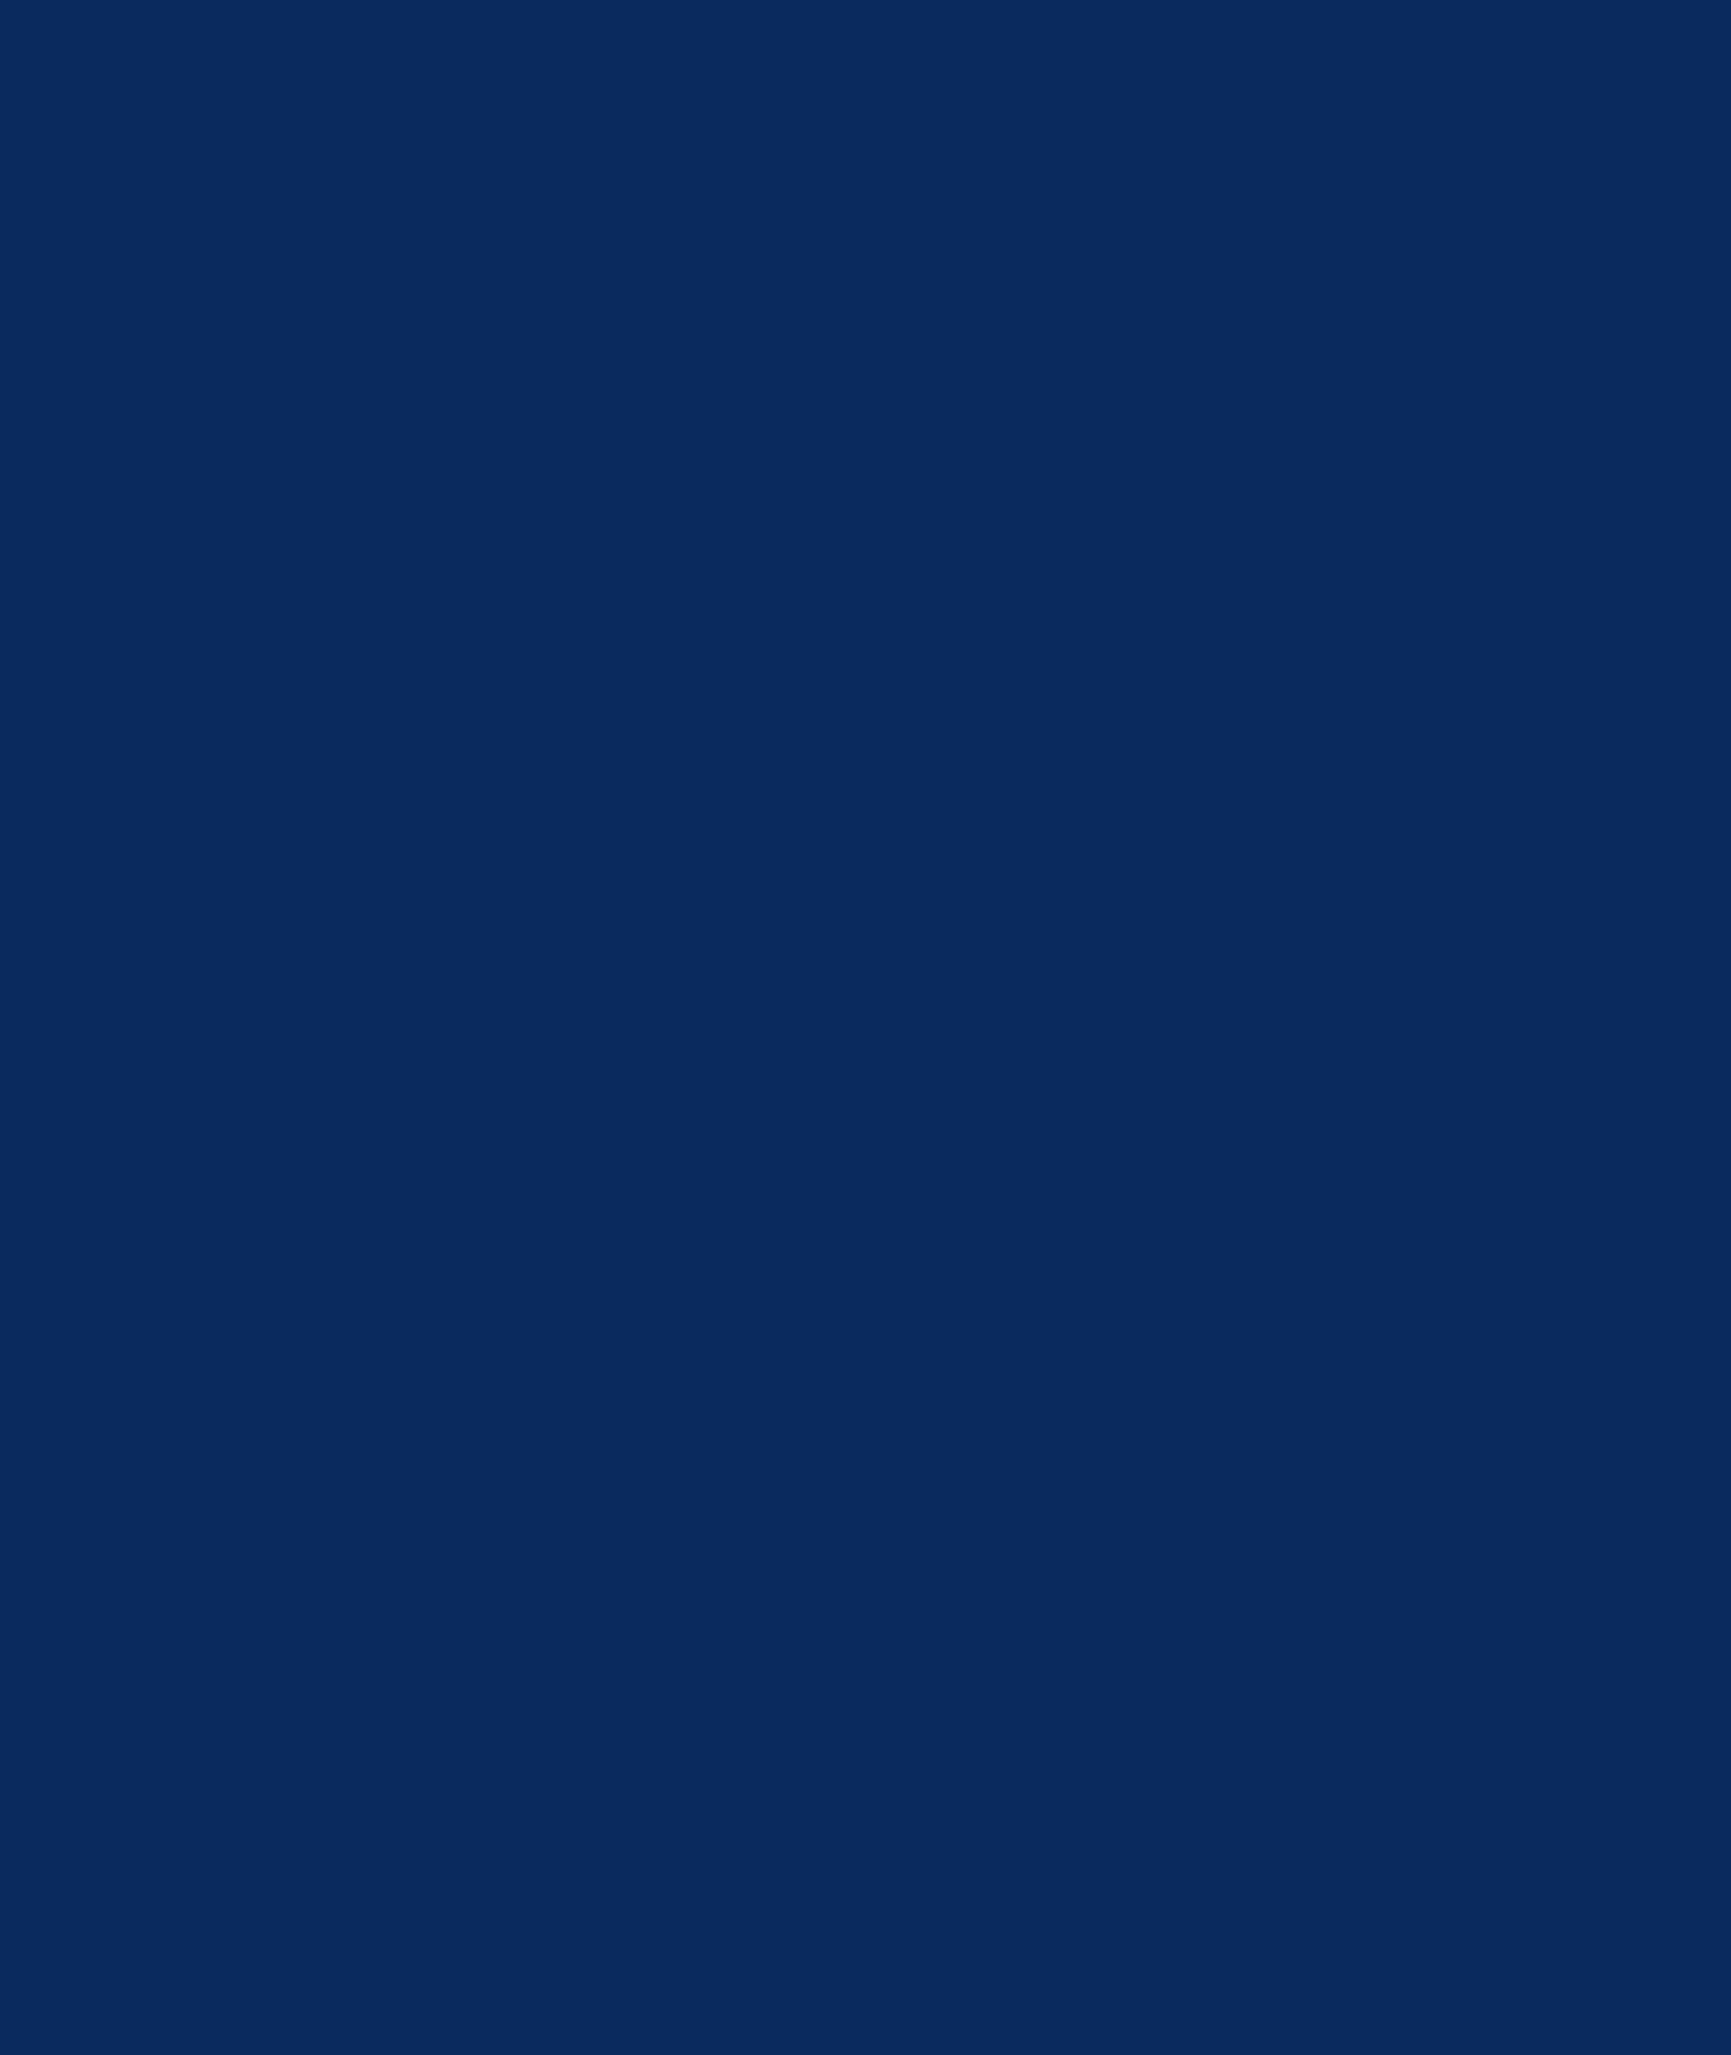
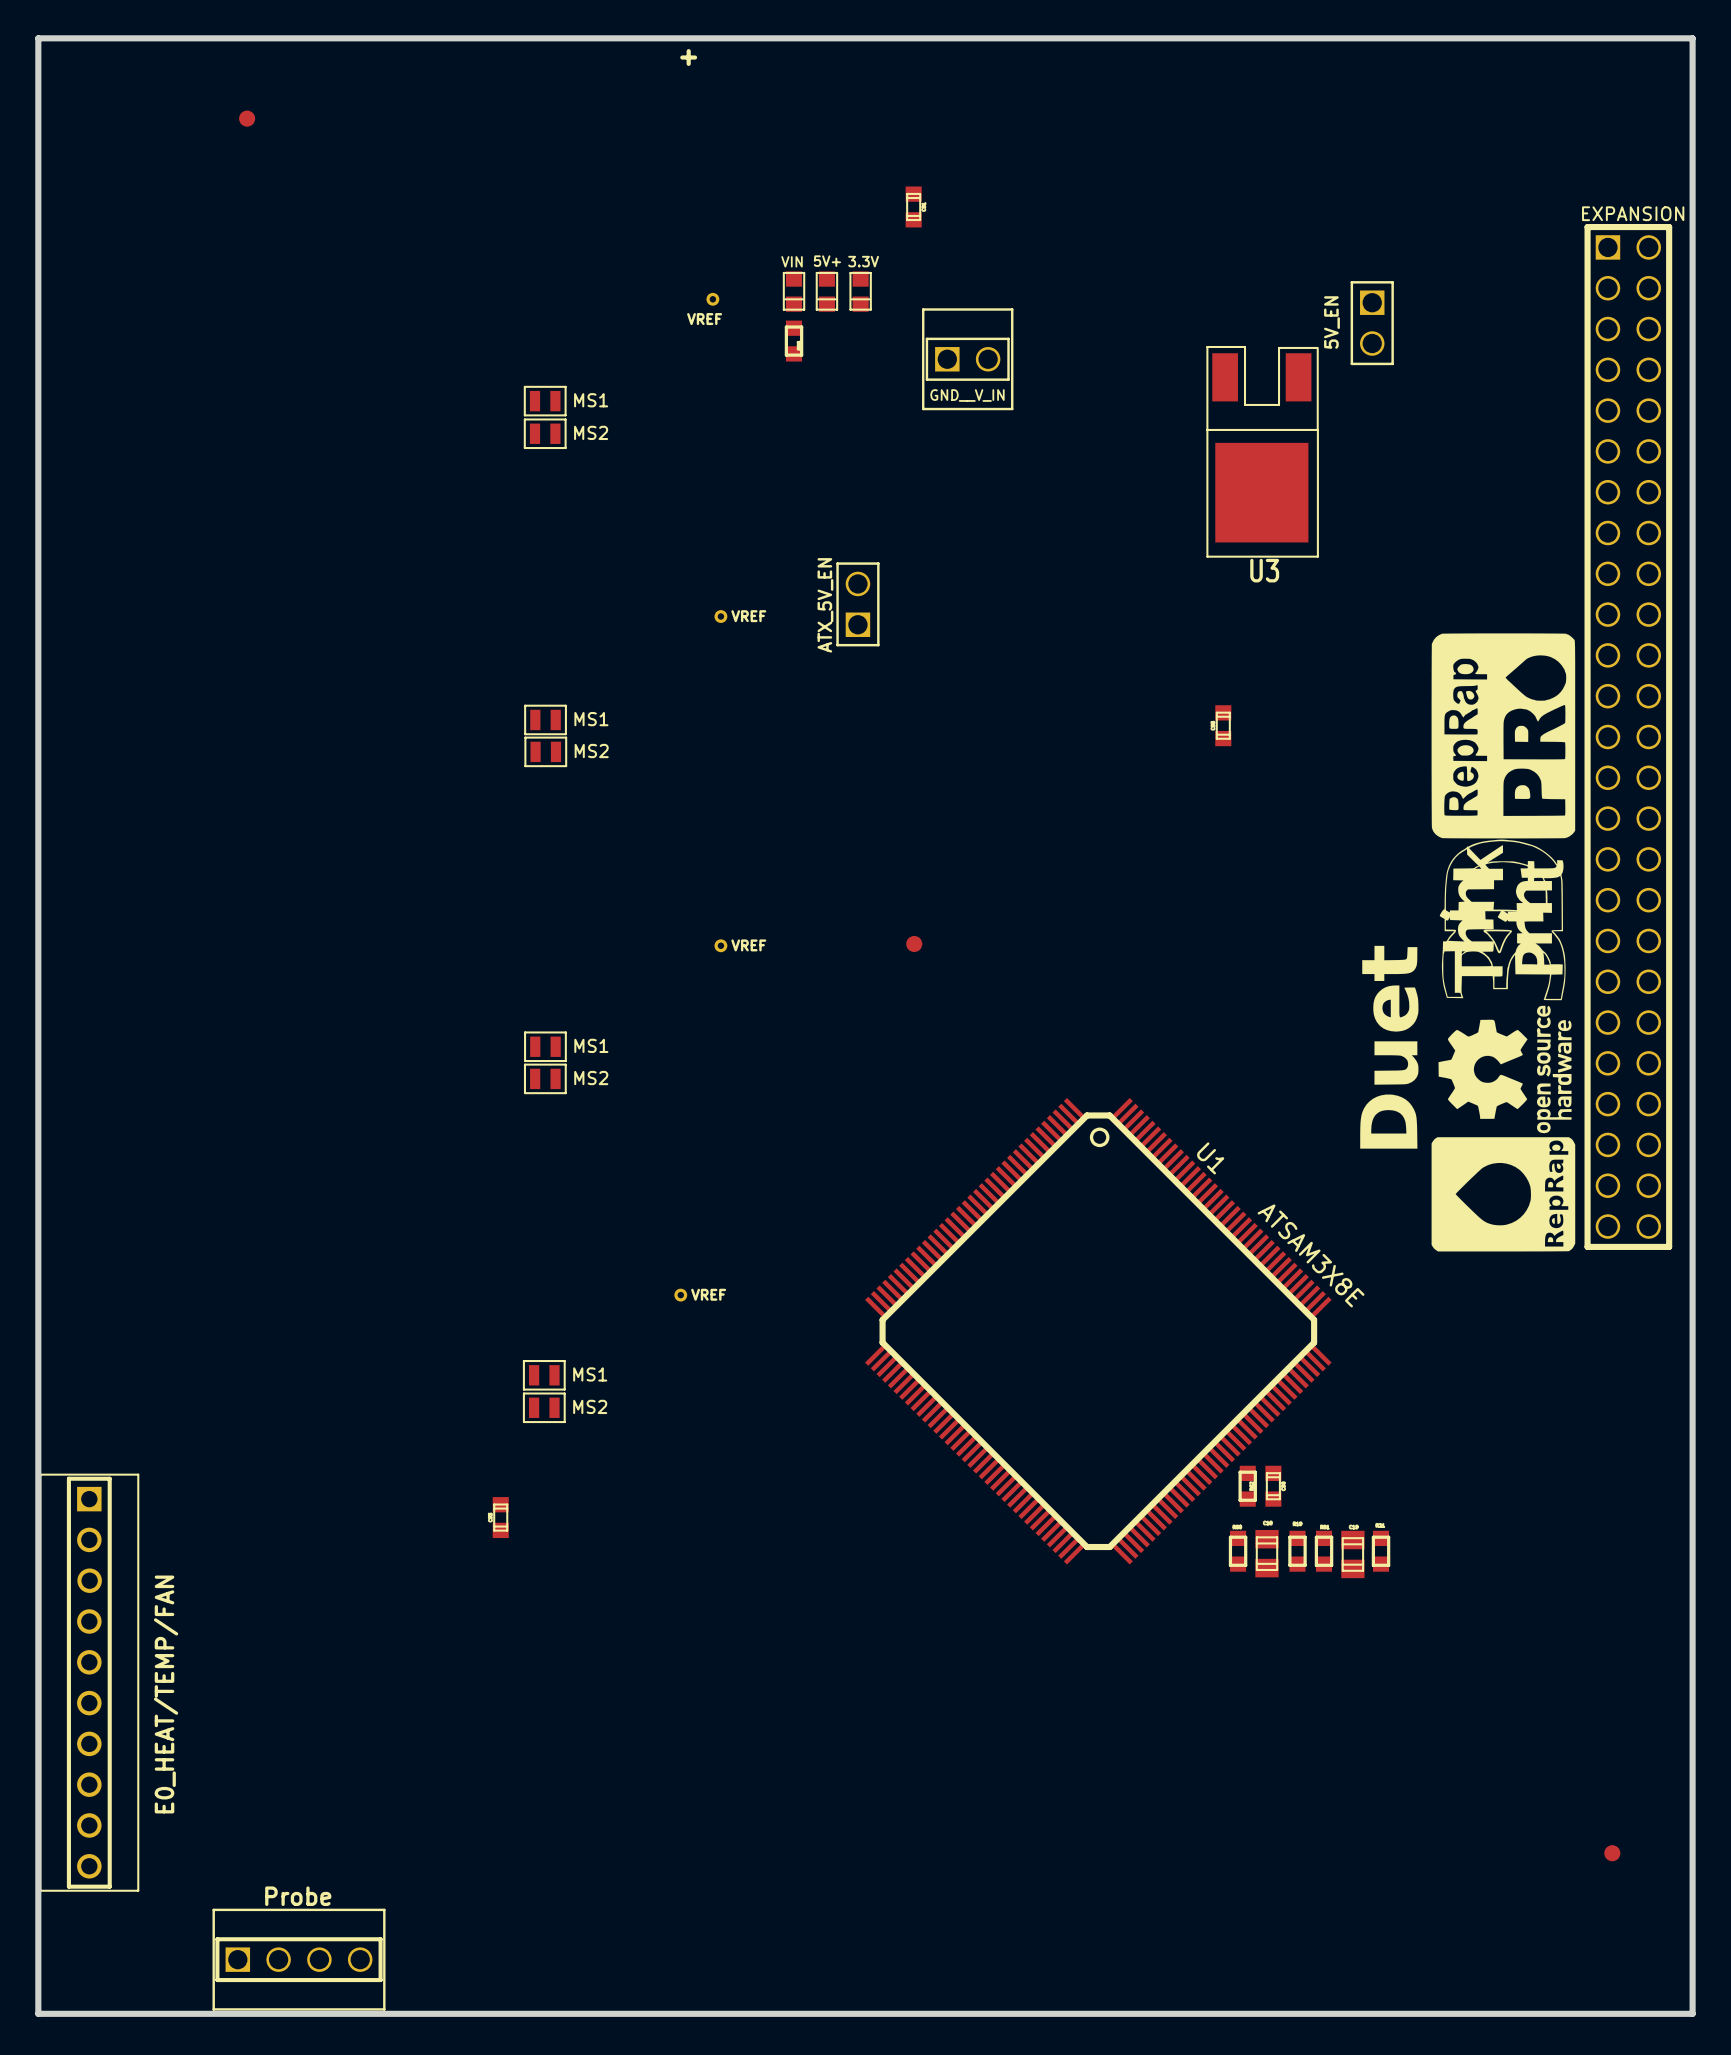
board edge: none -> (38, 38) (1692, 38) (1692, 2013) (38, 2013) (38, 38)
text: none -> + (688, 57)
part: none -> (247, 118)
part: none -> (913, 206)
part: none -> VIN (794, 291)
part: none -> 5V+ (826, 291)
part: none -> 3.3V (860, 291)
part: none -> VREF (712, 299)
part: none -> 5V_EN (1372, 323)
part: none -> (794, 341)
part: none -> GND__V_IN (967, 359)
part: none -> MS1 (545, 401)
part: none -> MS2 (545, 433)
U3: none -> (1262, 451)
part: none -> ATX_5V_EN (857, 604)
part: none -> VREF (720, 616)
drawing: none -> [1360, 633, 1576, 1252]
part: none -> MS1 (545, 719)
part: none -> (1223, 725)
part: none -> EXPANSION (1628, 736)
part: none -> MS2 (545, 751)
part: none -> (914, 943)
part: none -> VREF (720, 945)
part: none -> MS1 (545, 1046)
part: none -> MS2 (545, 1078)
part: none -> VREF (680, 1295)
U1: none -> ATSAM3X8E (1098, 1331)
part: none -> MS1 (544, 1375)
part: none -> MS2 (544, 1407)
part: none -> (1247, 1486)
part: none -> (1273, 1486)
part: none -> (500, 1517)
part: none -> (1238, 1551)
part: none -> (1297, 1551)
part: none -> (1324, 1551)
part: none -> (1381, 1551)
part: none -> (1266, 1553)
part: none -> (1352, 1554)
part: none -> E0_HEAT/TEMP/FAN (89, 1682)
part: none -> (1612, 1853)
part: none -> Probe (299, 1959)

